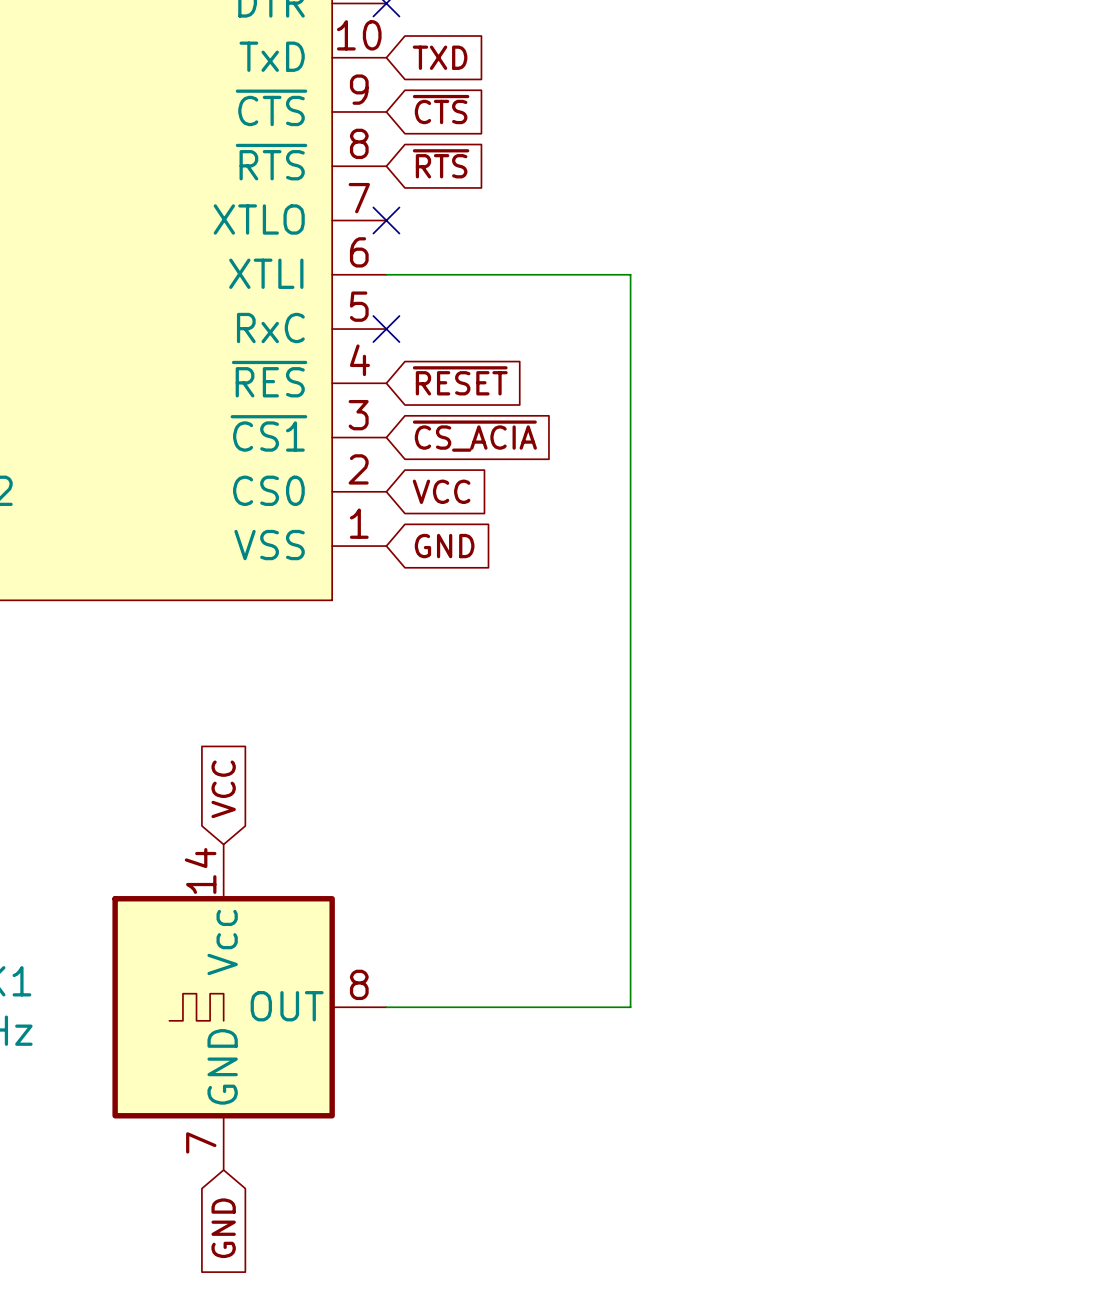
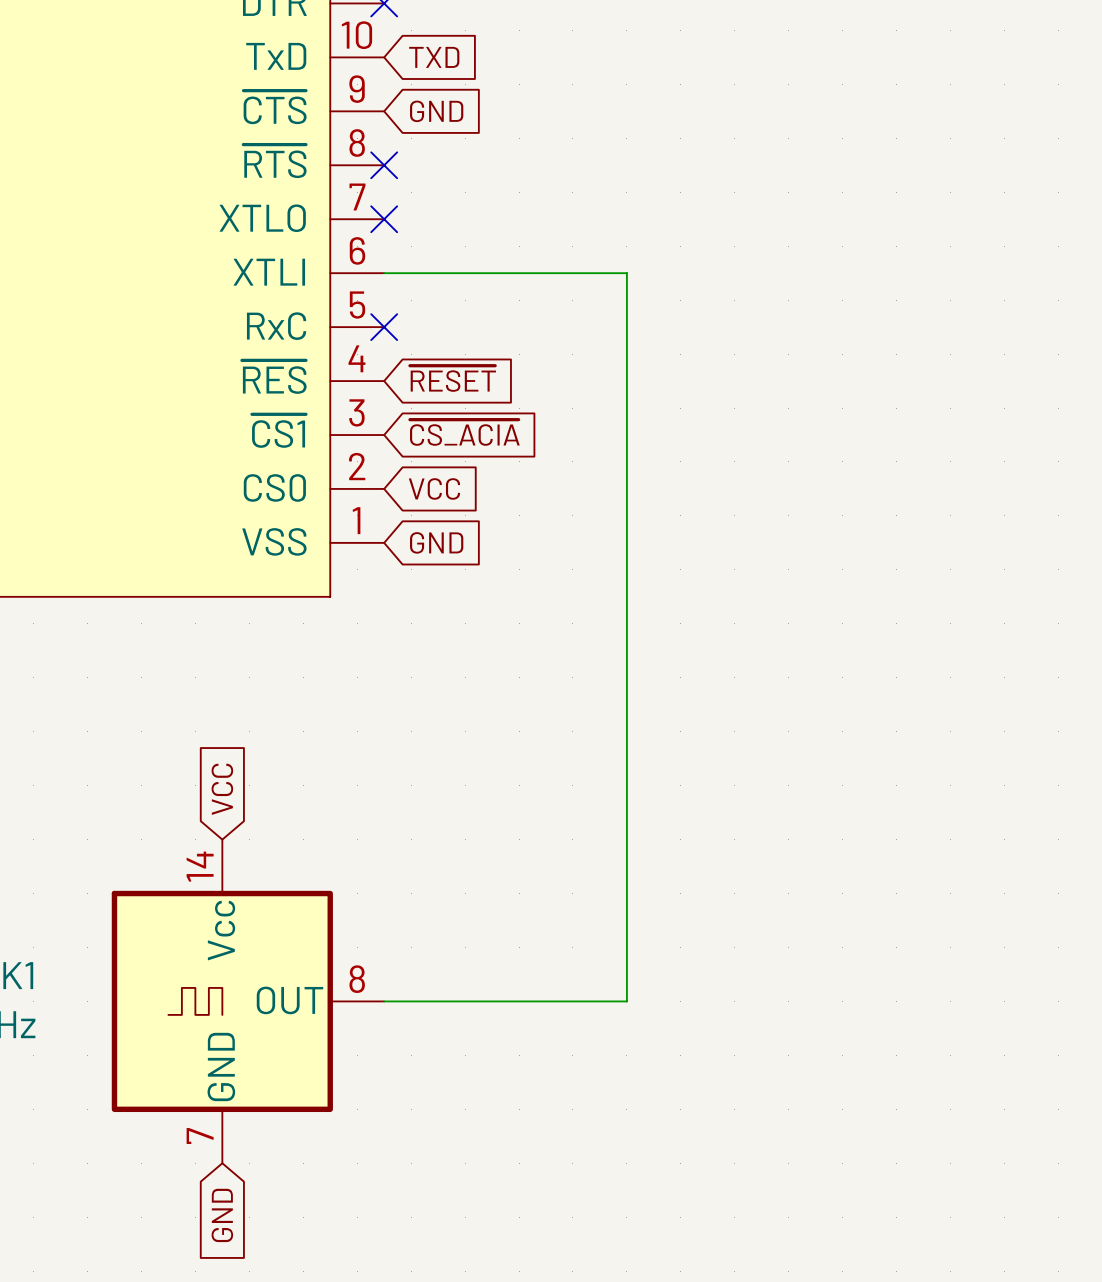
global label: ~{CTS} (441, 109) -> GND (436, 111)
global label: ~{RTS} (441, 163) -> none
no-connect mark: none -> (384, 165)

